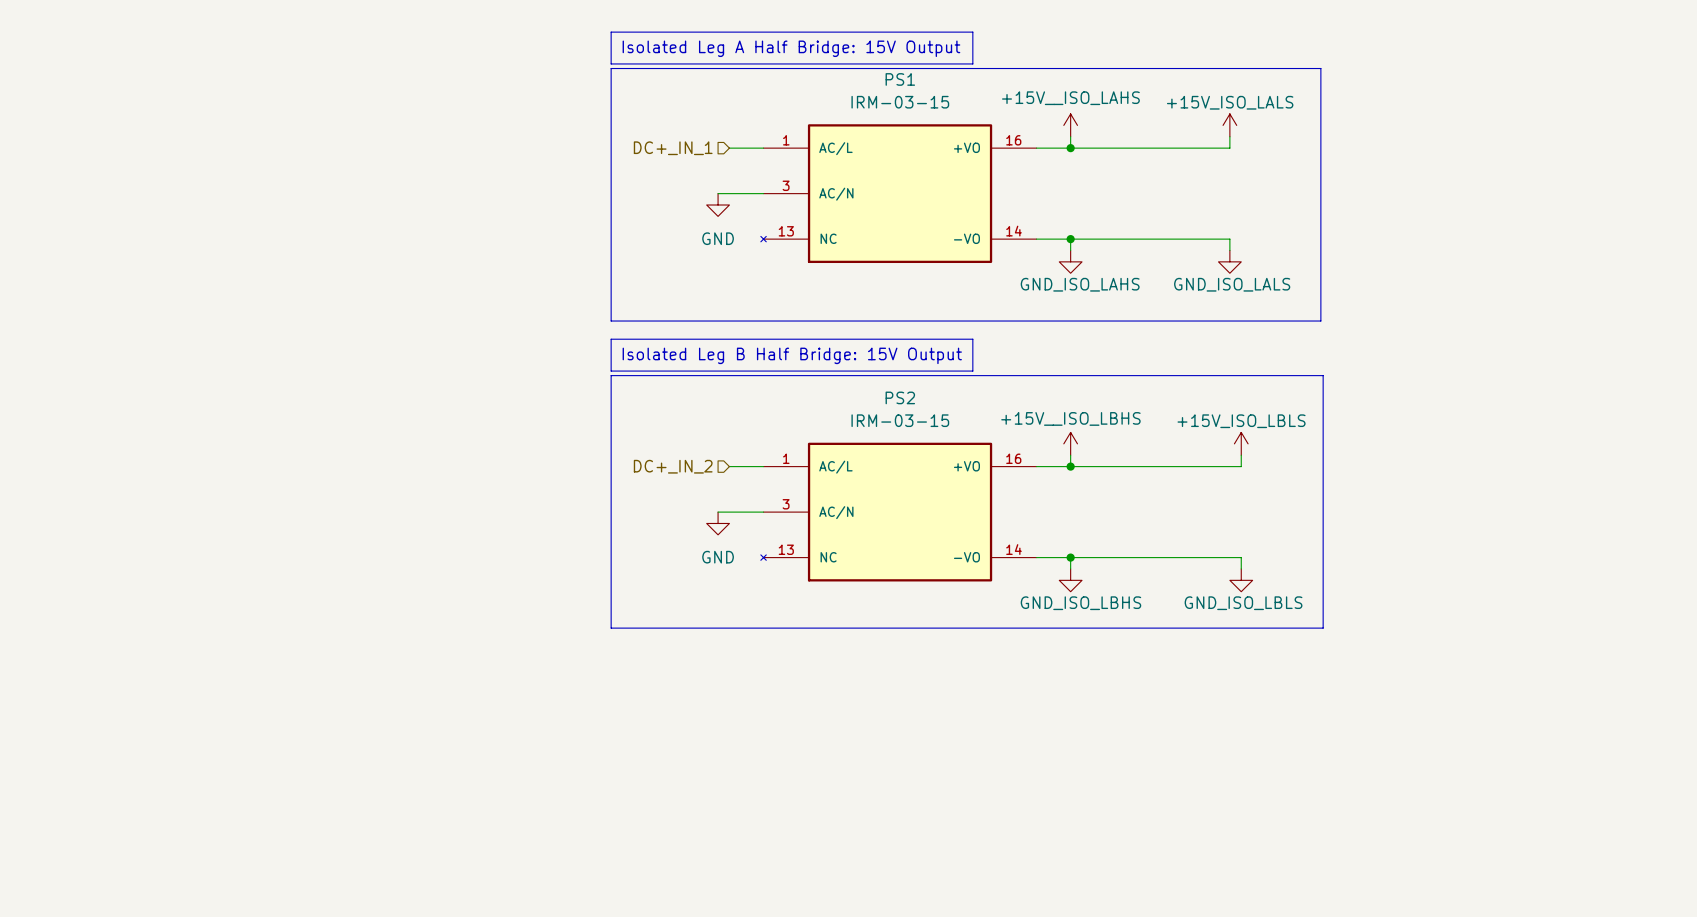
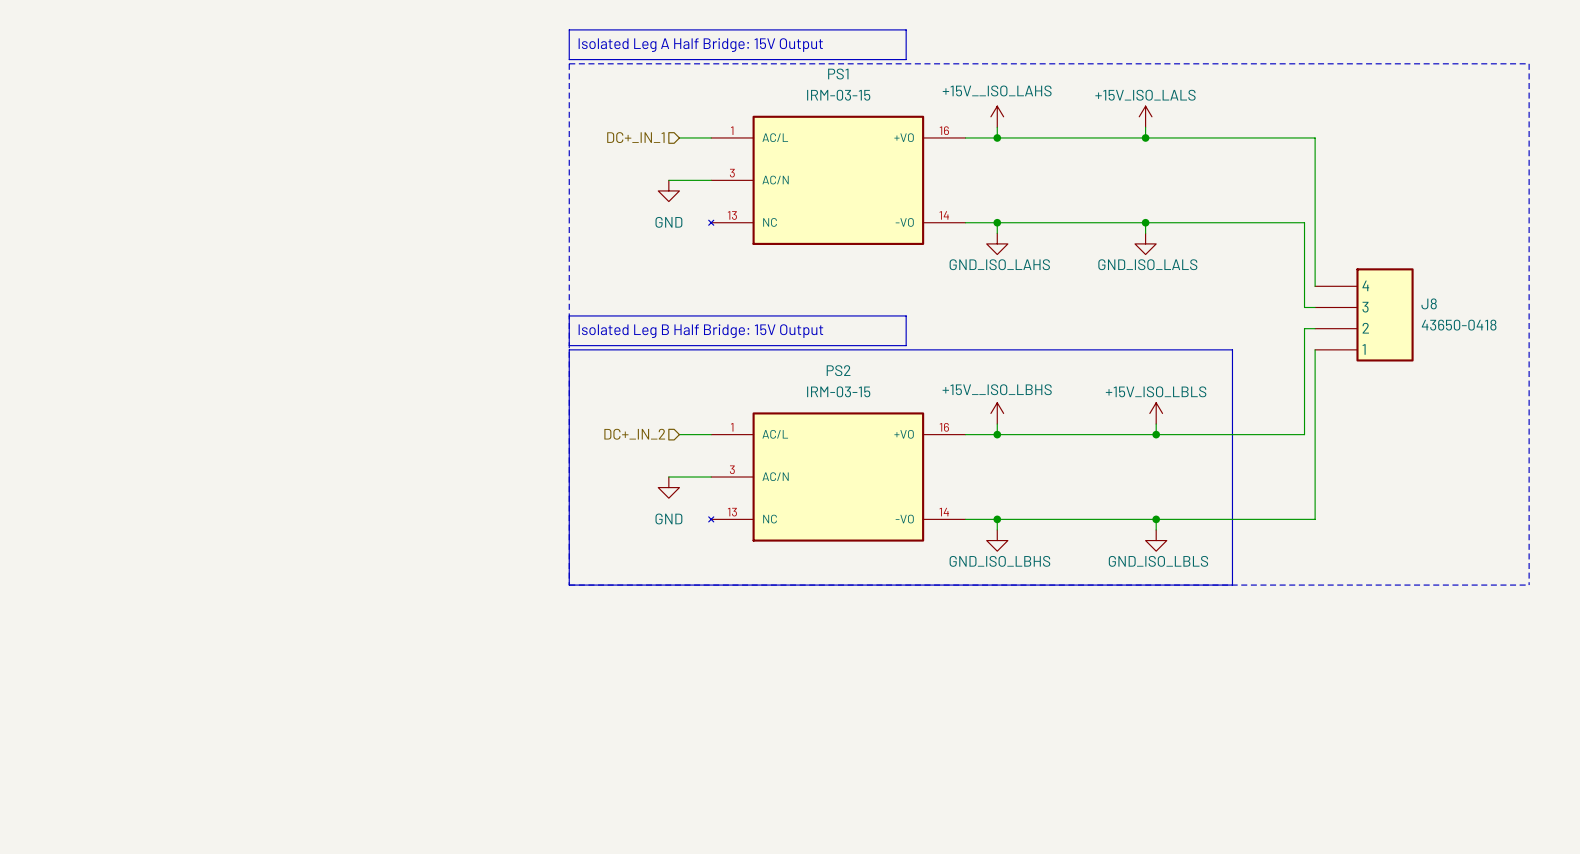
line: (611, 68) (611, 321) (1320, 321) (1320, 68) (611, 68) -> (569, 63) (569, 585) (1529, 585) (1529, 63) (569, 63)
wire: none -> (1145, 137) (1315, 137) (1315, 286)
junction: none -> (1145, 137)
wire: none -> (1145, 222) (1304, 222) (1304, 307) (1315, 307)
junction: none -> (1145, 222)
J8: none -> 43650-0418 (1364, 314)
wire: none -> (1315, 328) (1304, 328) (1304, 434) (1156, 434)
wire: none -> (1315, 349) (1315, 519) (1156, 519)
junction: none -> (1156, 434)
junction: none -> (1156, 519)

